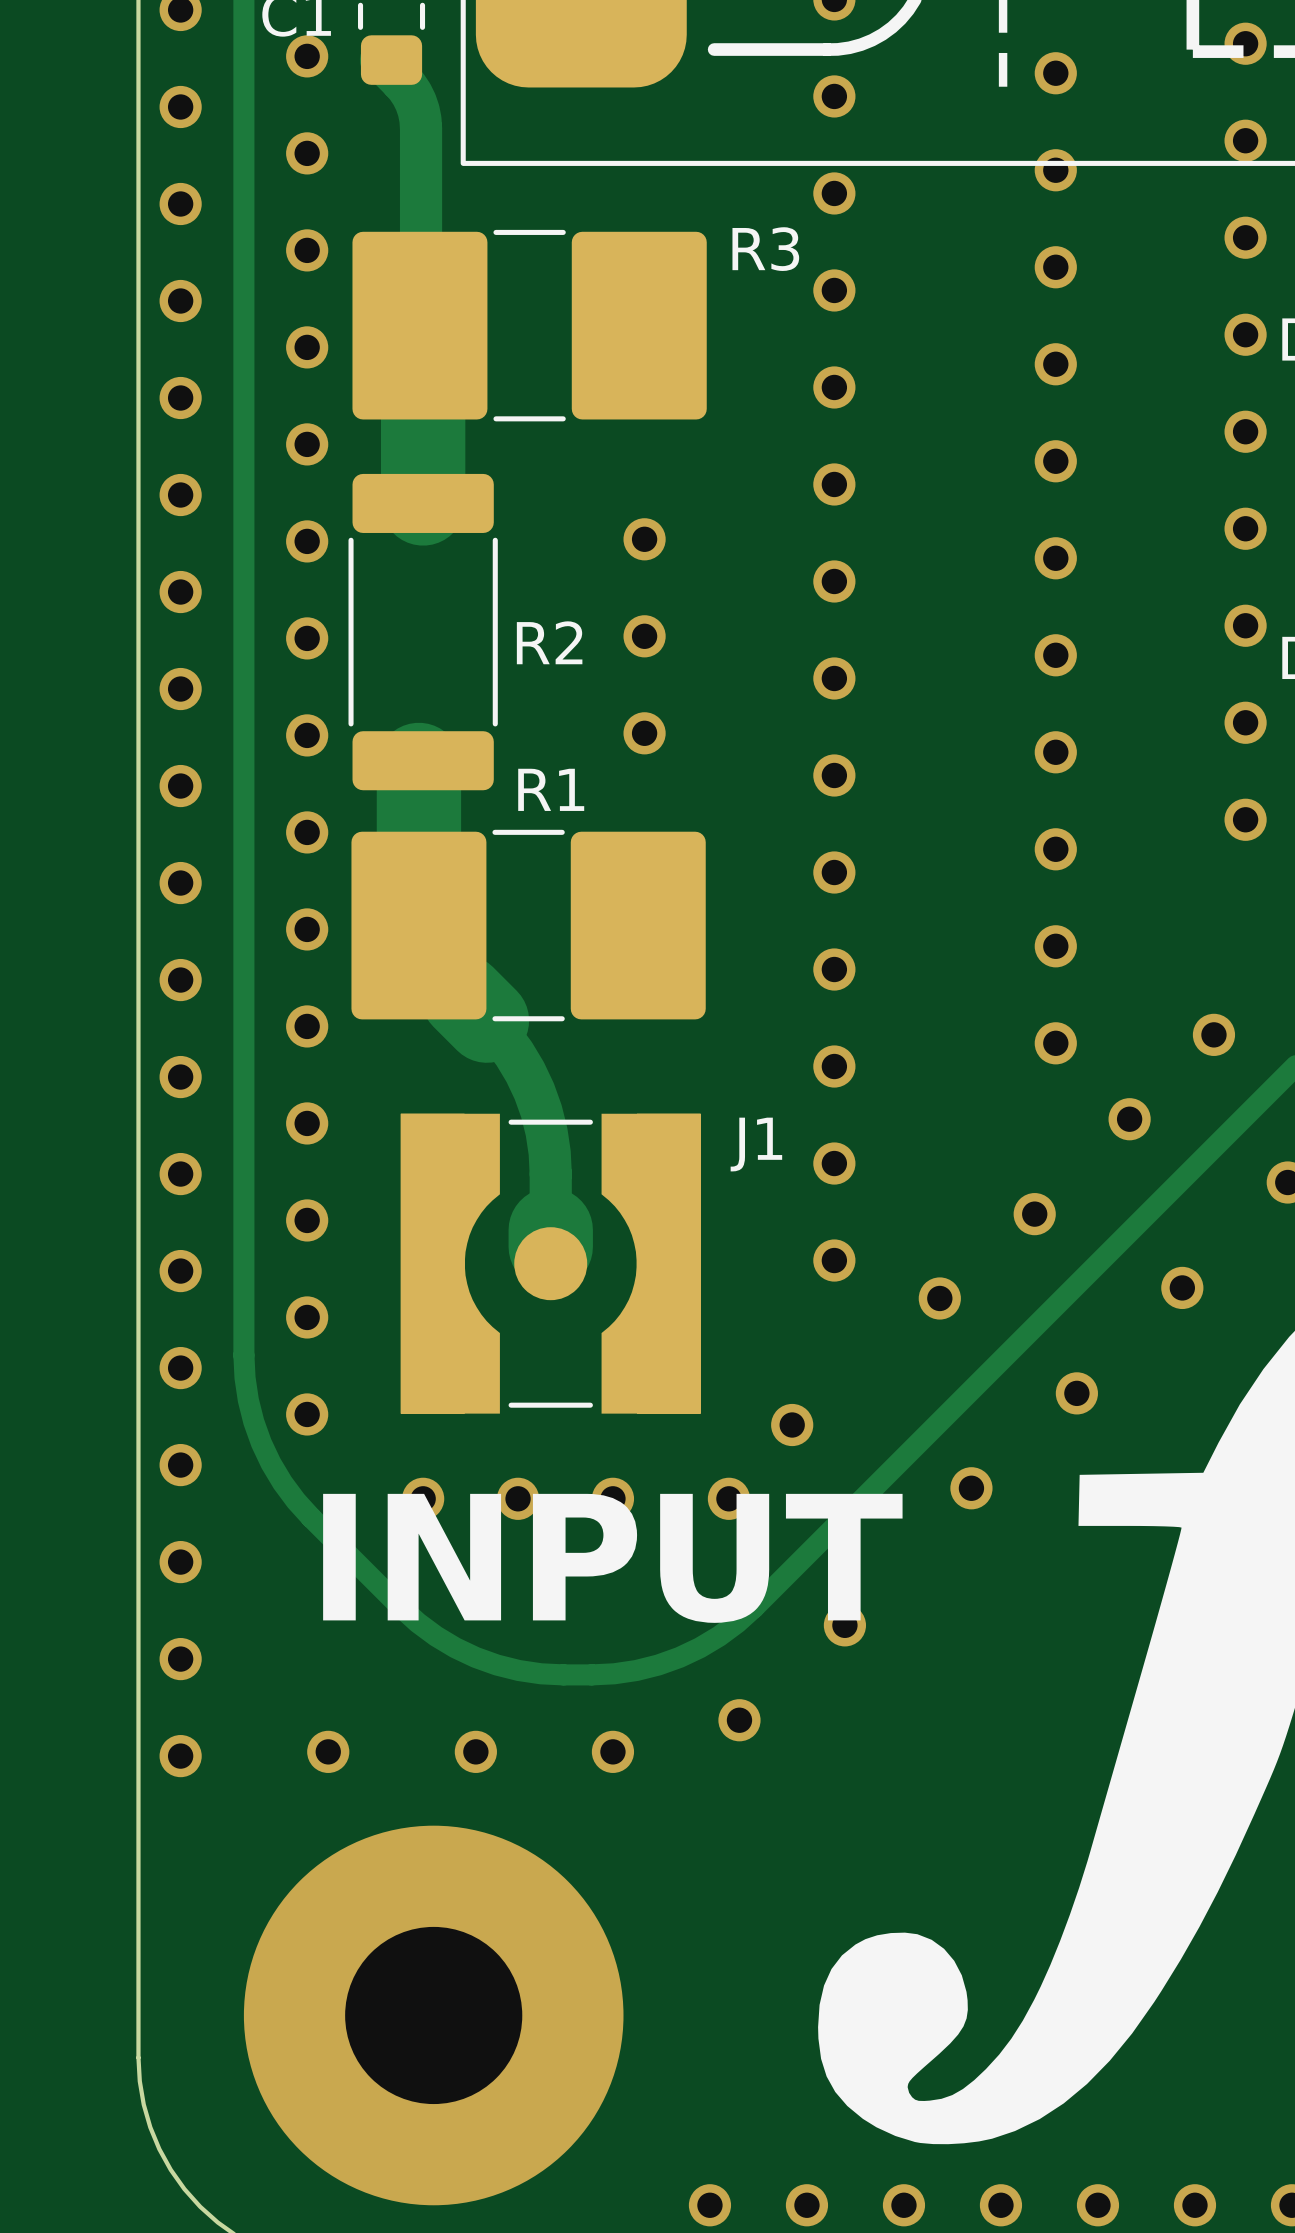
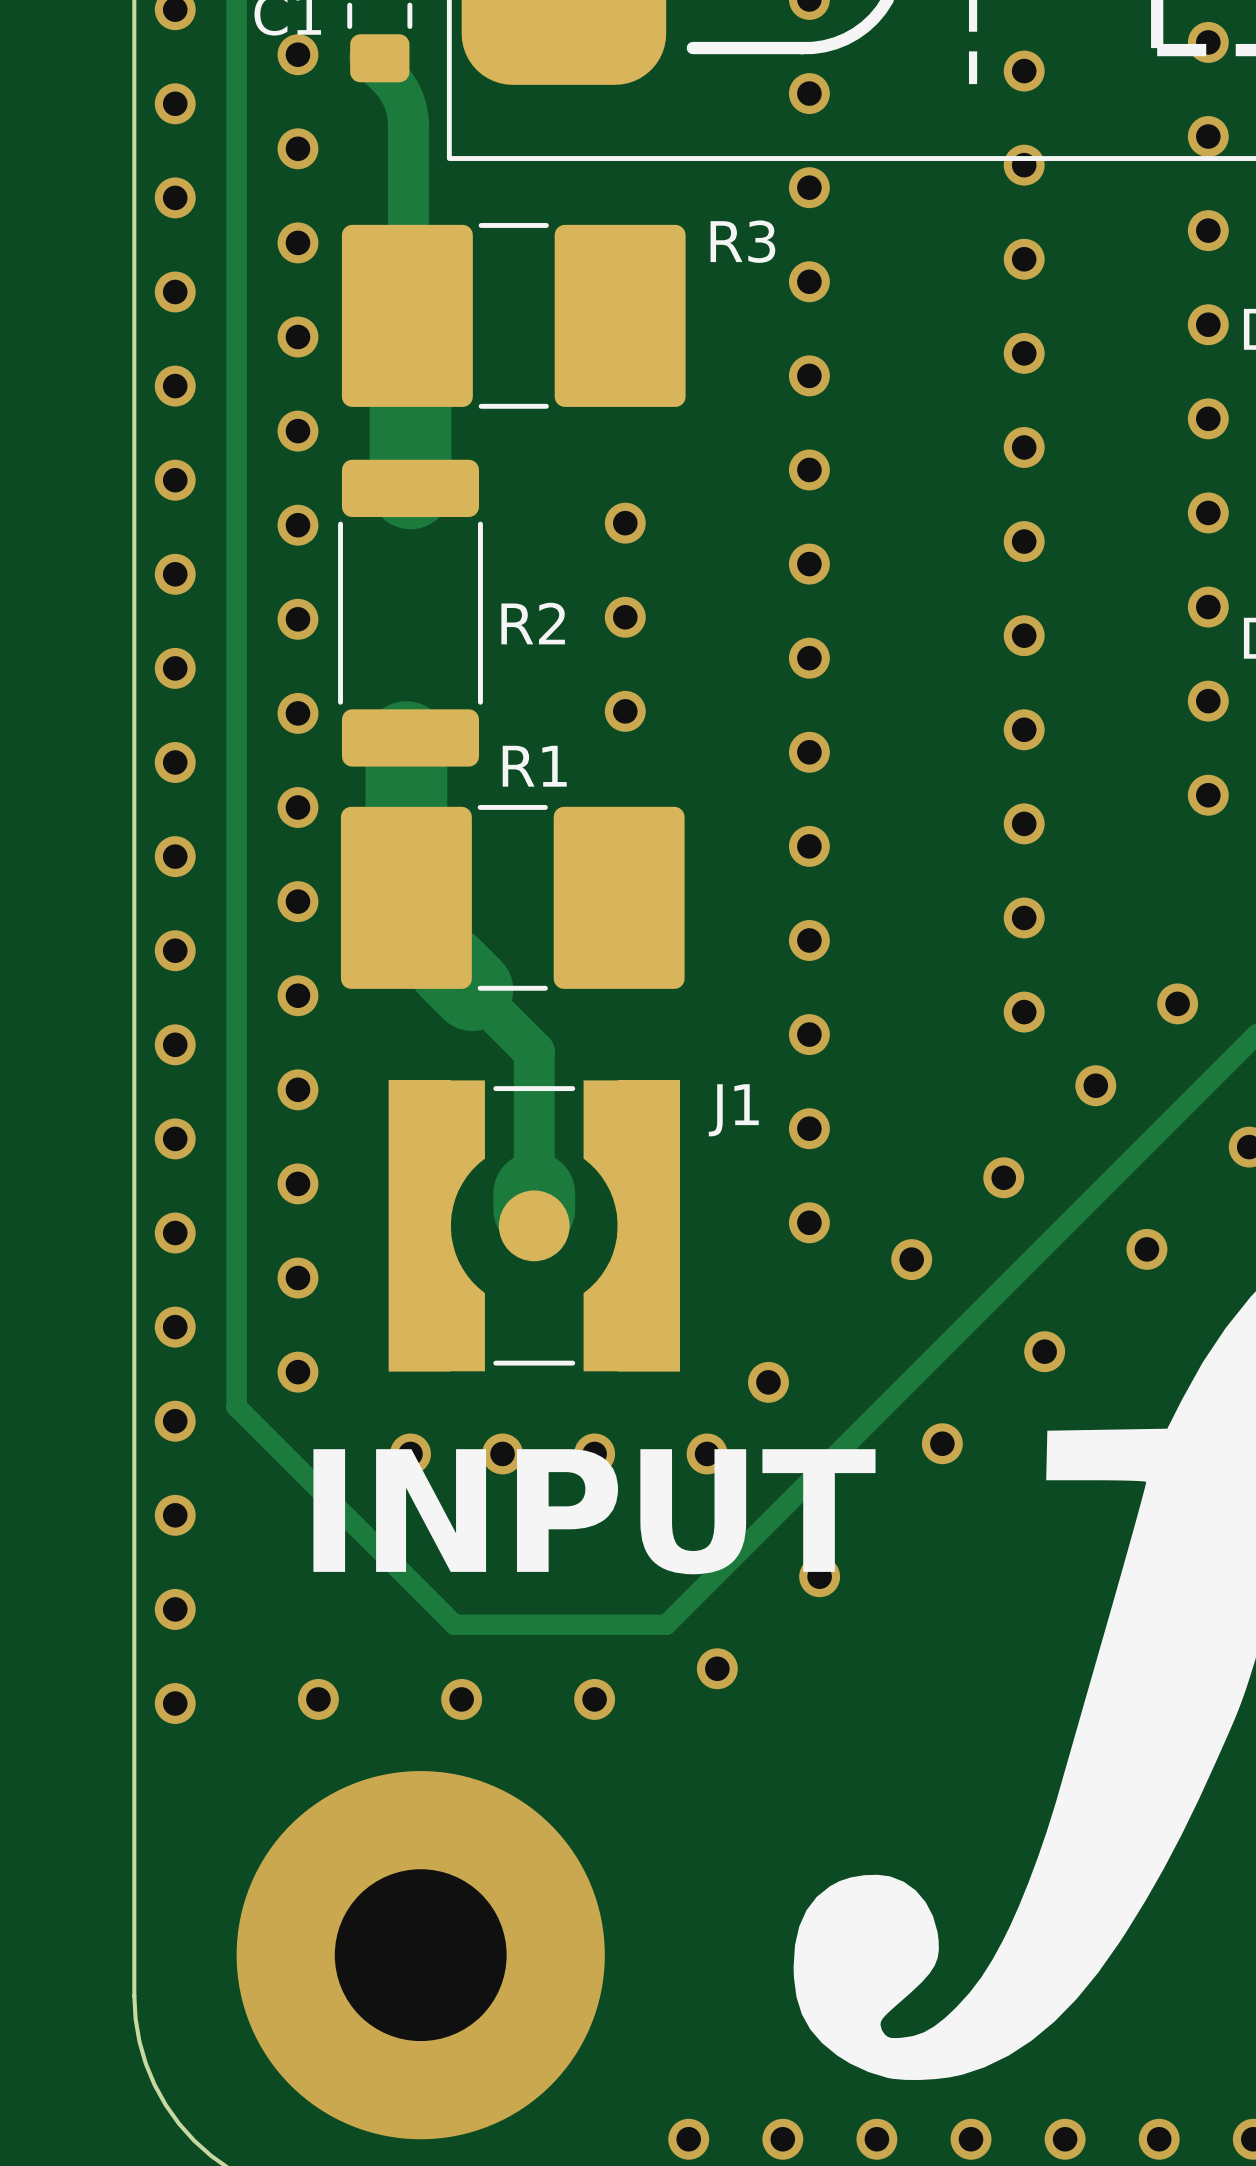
track: (487, 1021) (514, 1053) (534, 1091) (546, 1131) (550, 1174) -> (472, 990) (534, 1051) (534, 1138)
track: (243, 1355) (248, 1400) (261, 1443) (282, 1482) (311, 1517) -> (236, 1314) (236, 1406) (301, 1472)
track: (401, 1607) (436, 1636) (475, 1657) (518, 1670) (563, 1674) -> (389, 1559) (454, 1624) (546, 1624)
track: (753, 1607) (719, 1636) (679, 1657) (636, 1670) (591, 1674) -> (731, 1559) (666, 1624) (573, 1624)

